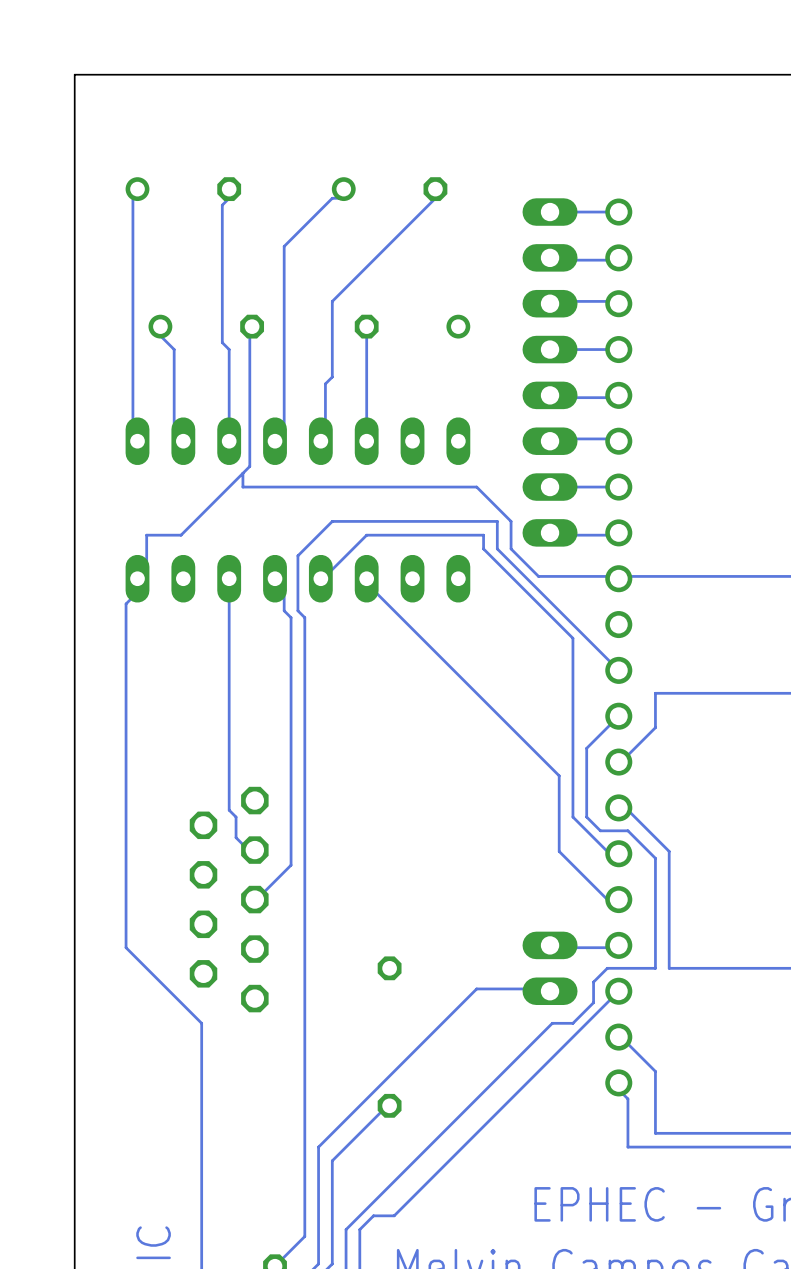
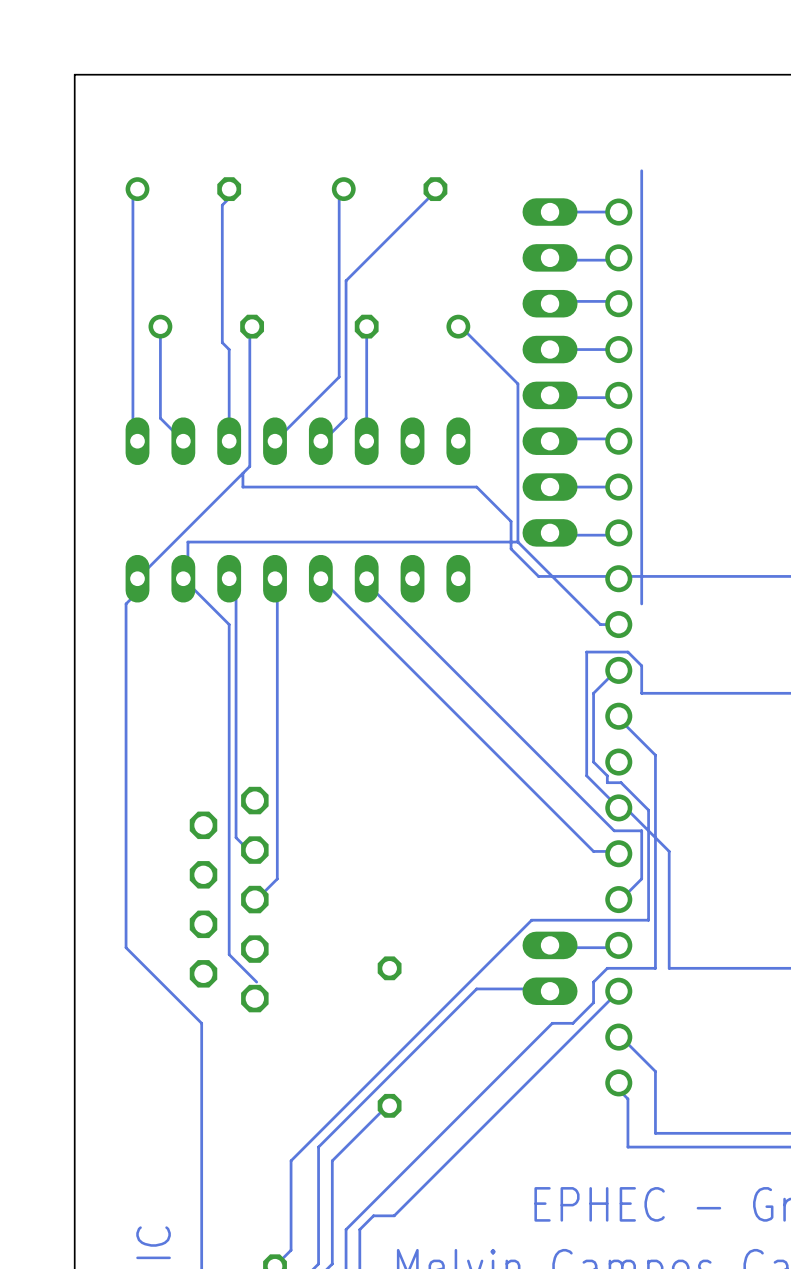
bottom track: none -> (641, 170) (641, 603)
bottom track: (435, 191) (435, 198) (332, 301) (332, 377) (325, 383) (325, 438) -> (435, 191) (346, 280) (346, 418) (325, 438)
bottom track: (339, 198) (332, 198) (284, 246) (284, 432) -> (339, 198) (339, 377) (284, 432)
bottom track: none -> (458, 326) (462, 328) (517, 383) (517, 542)
bottom track: (160, 335) (174, 349) (174, 432) -> (160, 335) (160, 418) (174, 432)
bottom track: (181, 535) (146, 535) (146, 569) -> (181, 535) (146, 569)
bottom track: none -> (517, 542) (600, 624) (618, 624)
bottom track: none -> (517, 542) (187, 542) (187, 576) (183, 578) (229, 624)
bottom track: (320, 578) (366, 535) (483, 535) (483, 548) (572, 638) (572, 817) (614, 858) (618, 853) -> (320, 578) (593, 851) (614, 851) (618, 853)
bottom track: (229, 583) (229, 624) -> (229, 583) (236, 590) (236, 817)
bottom track: (277, 583) (284, 590) (284, 610) (291, 617) (291, 865) (277, 878) -> (277, 583) (277, 878)
bottom track: (618, 670) (497, 548) (497, 521) (332, 521) (297, 555) (297, 610) (304, 617) (304, 1236) (291, 1250) -> (618, 670) (593, 693) (593, 762) (607, 775) (607, 782) (621, 782) (648, 810) (648, 920) (531, 920) (291, 1160) (291, 1250)
bottom track: (655, 693) (655, 727) (621, 762) (618, 762) -> (655, 693) (641, 693) (641, 665) (627, 652) (586, 652) (586, 748)
bottom track: (618, 716) (586, 748) -> (618, 716) (655, 755) (655, 858)
bottom track: (559, 775) (559, 851) (607, 899) (618, 899) -> (559, 775) (614, 830)
bottom track: (586, 775) (586, 817) (600, 830) (614, 830) -> (586, 775) (618, 807)
bottom track: (229, 810) (236, 817) -> (229, 810) (229, 954) (256, 982)
bottom track: (627, 830) (655, 858) -> (627, 830) (641, 830) (641, 878) (621, 899) (618, 899)

